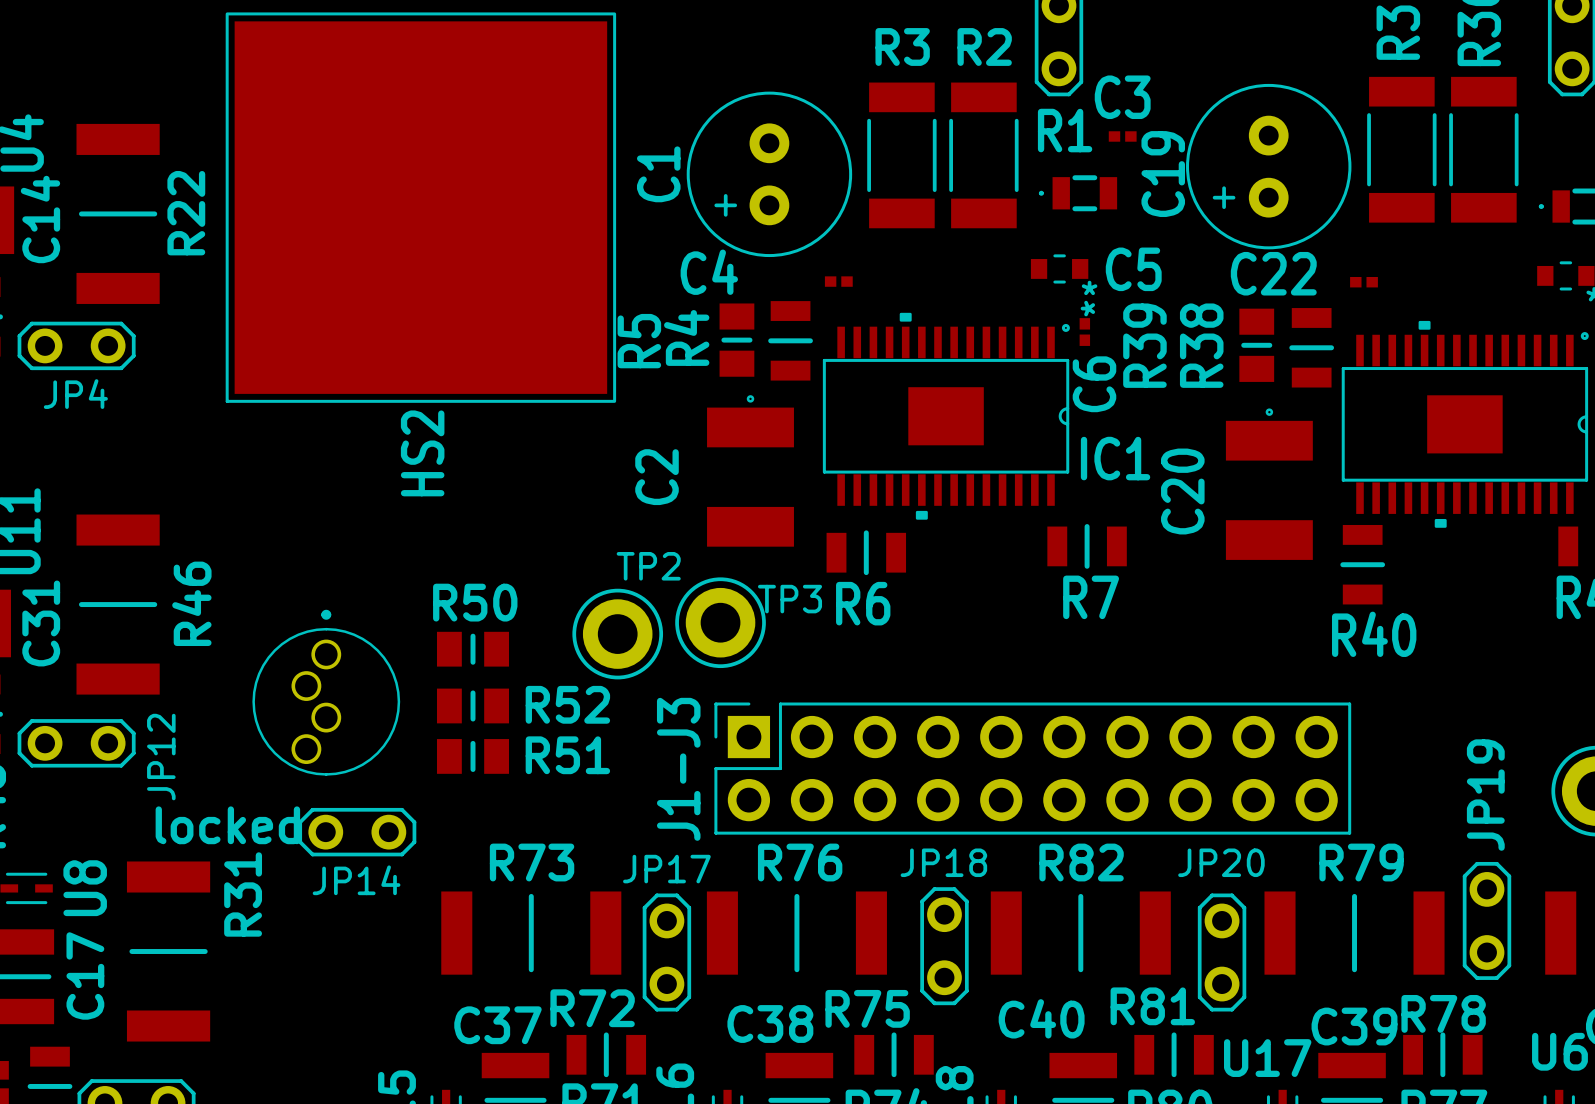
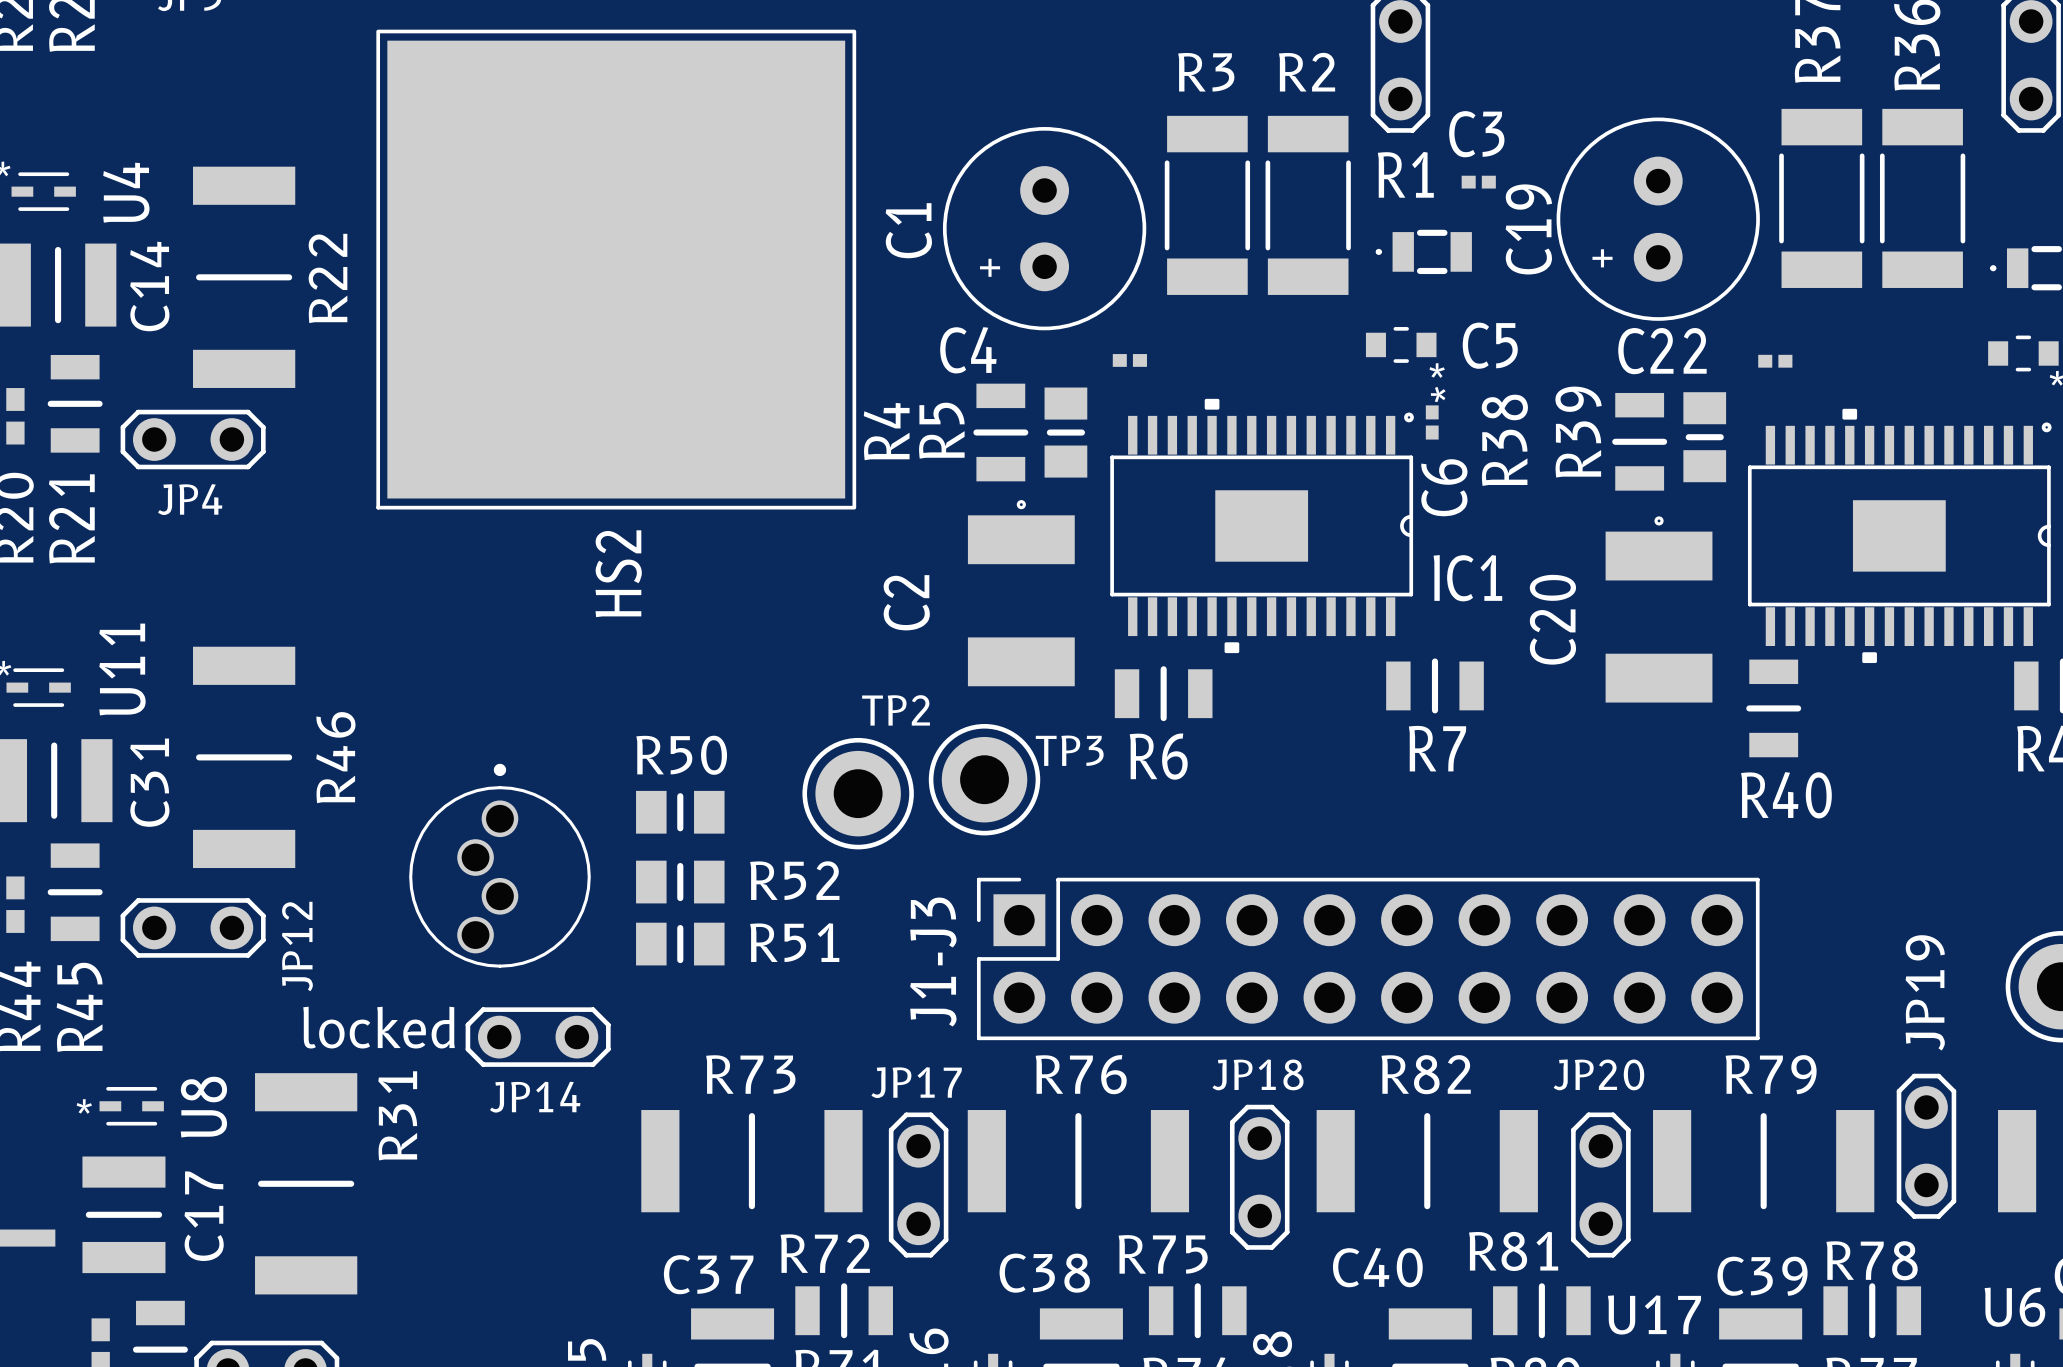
R4 name position: R4 (686, 337) -> R4 (886, 431)
R5 position: (736, 340) -> (1065, 432)
R4 position: (790, 340) -> (1000, 432)
R5 name position: R5 (639, 341) -> R5 (941, 430)
R39 name position: R39 (1144, 345) -> R39 (1578, 432)
R39 position: (1256, 345) -> (1704, 437)
R38 position: (1311, 347) -> (1639, 441)

